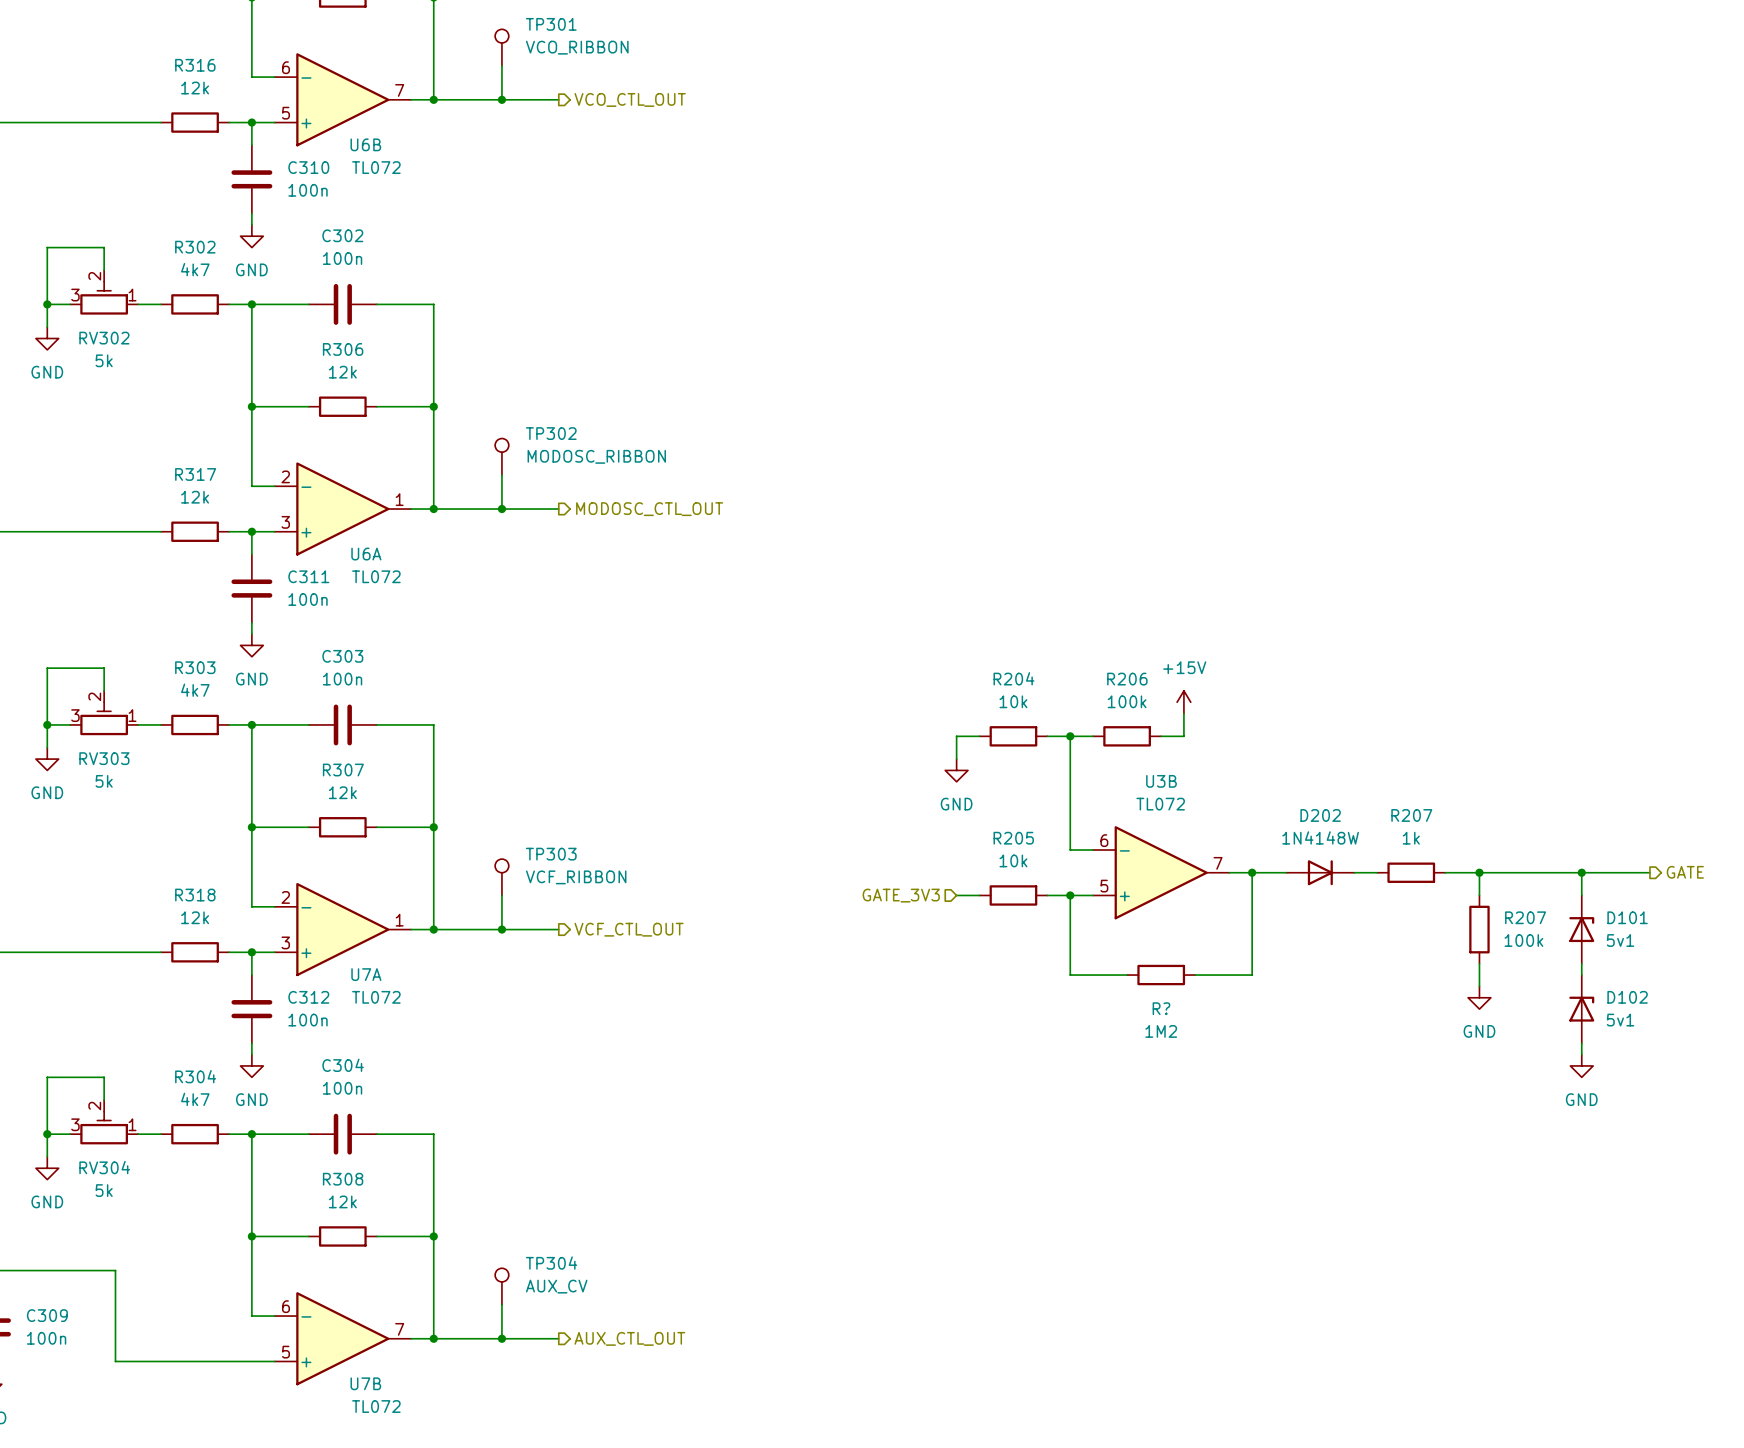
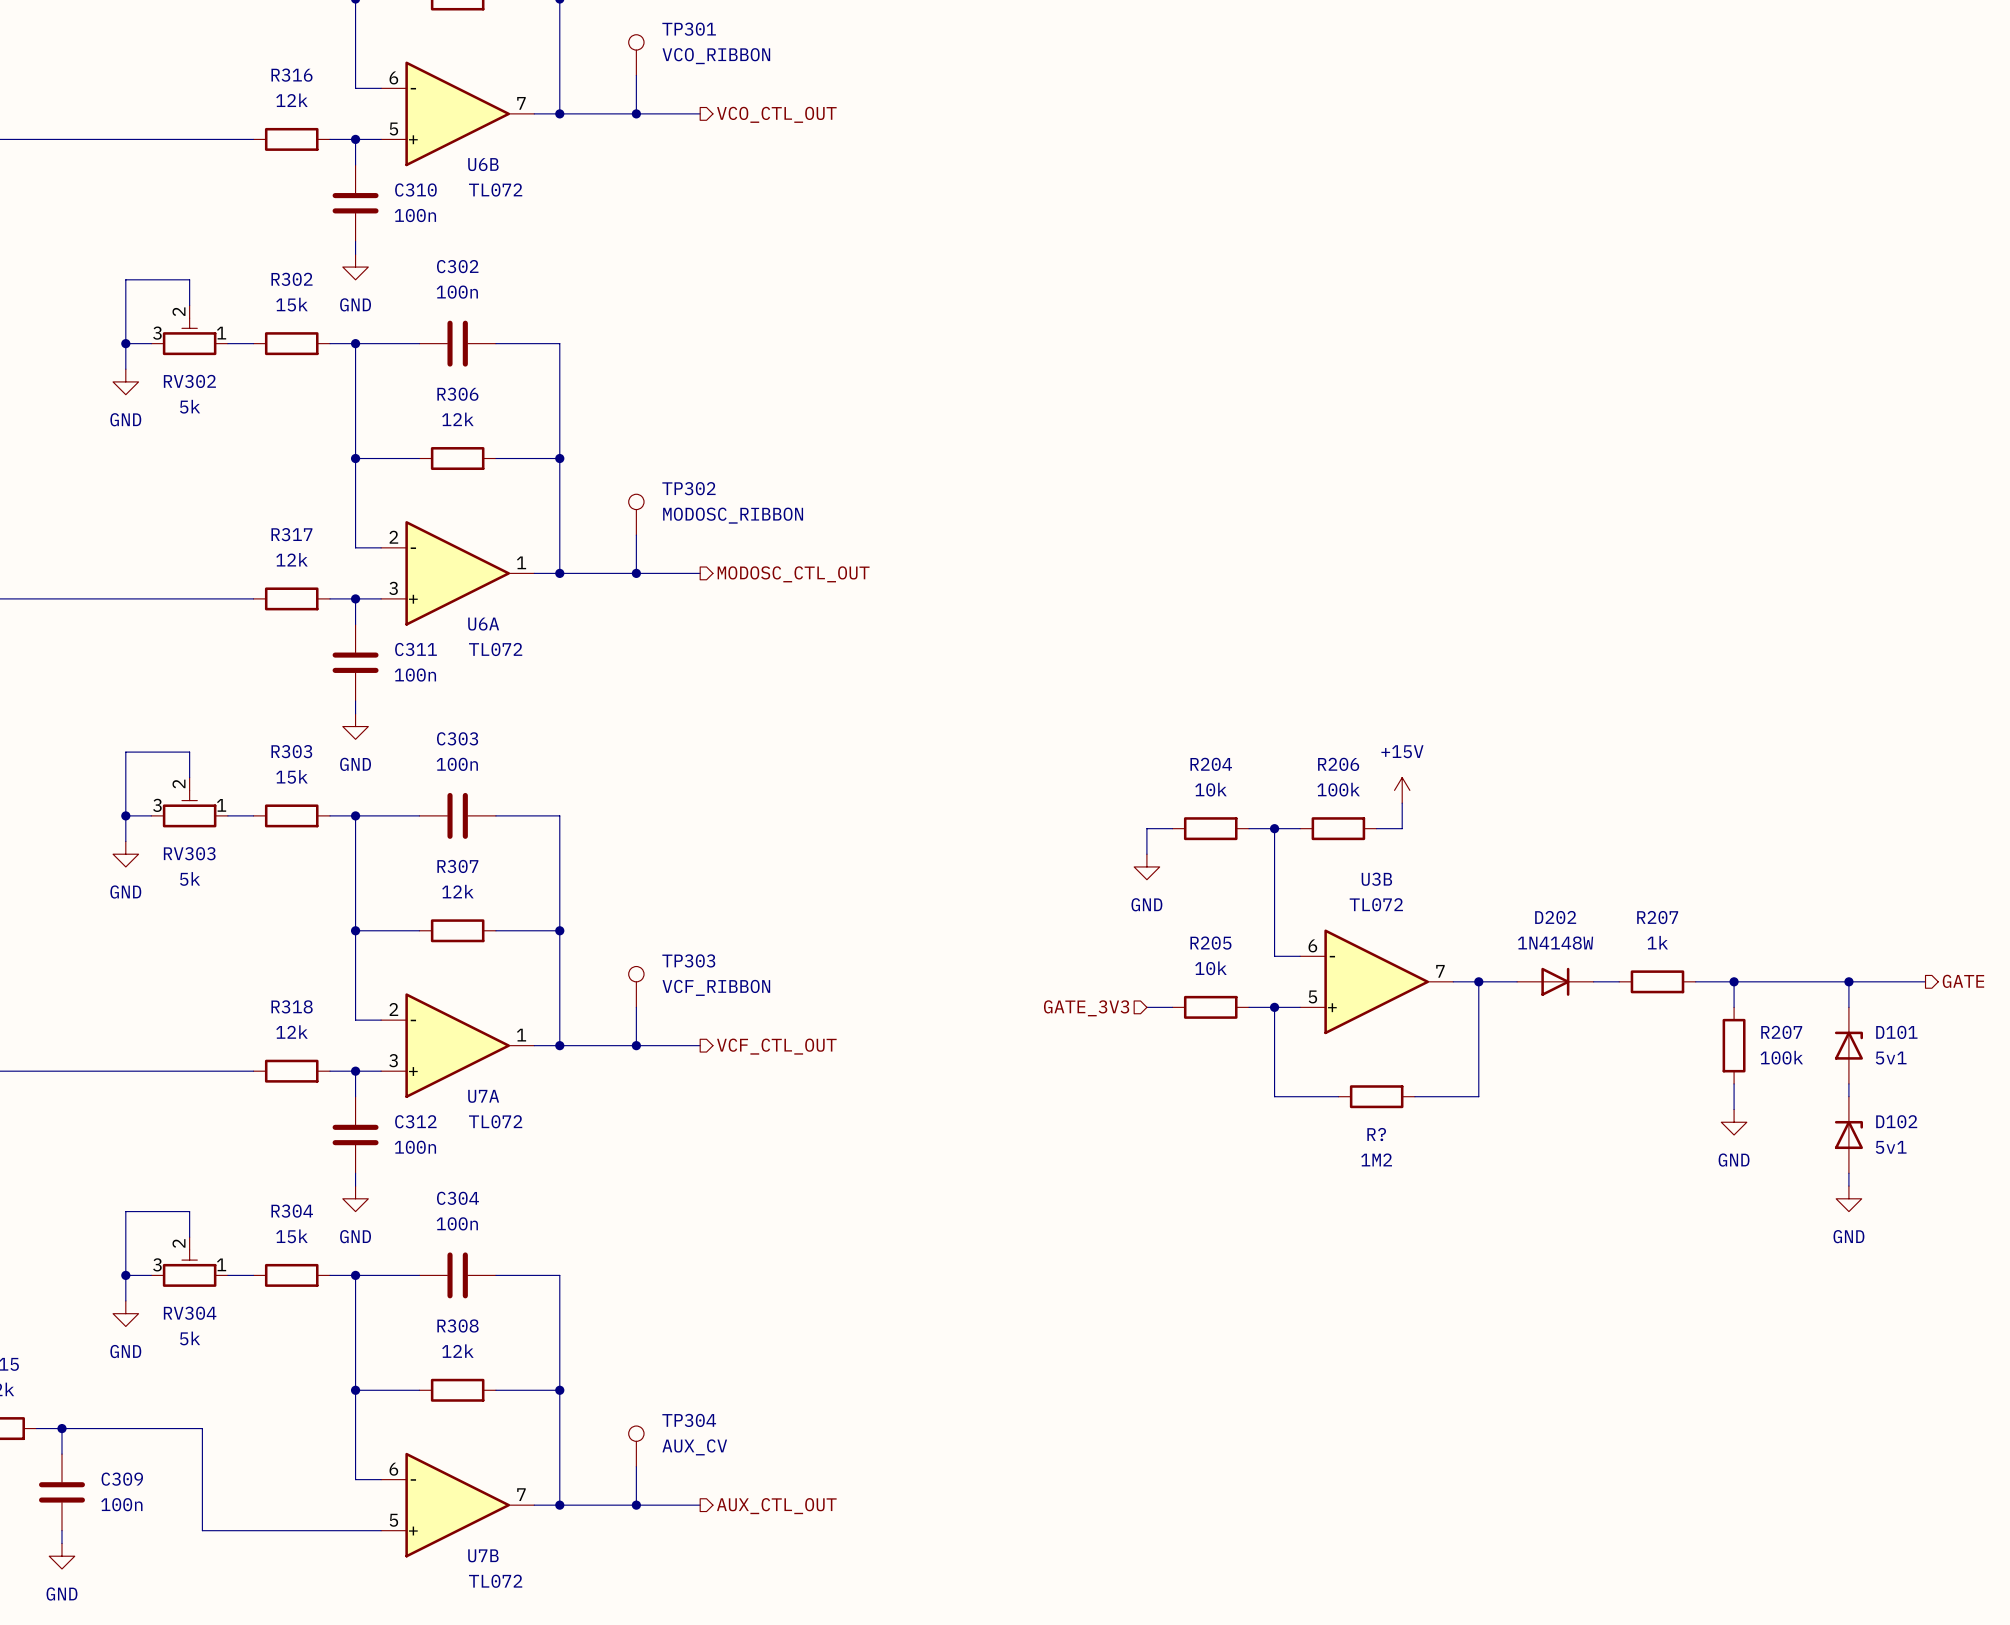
R302 value: 4k7 (195, 269) -> 15k (291, 304)
R303 value: 4k7 (195, 690) -> 15k (291, 776)
R304 value: 4k7 (195, 1099) -> 15k (291, 1236)

